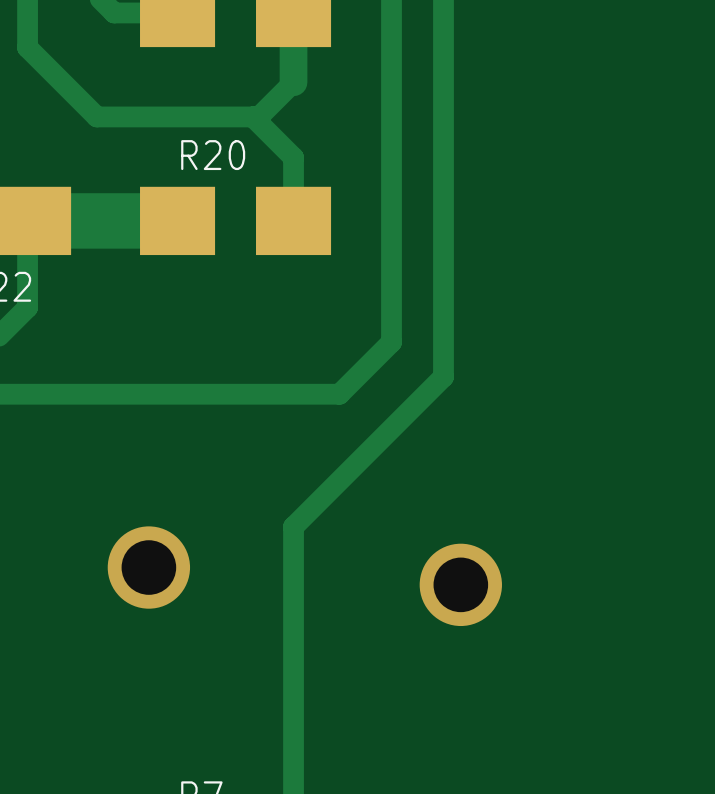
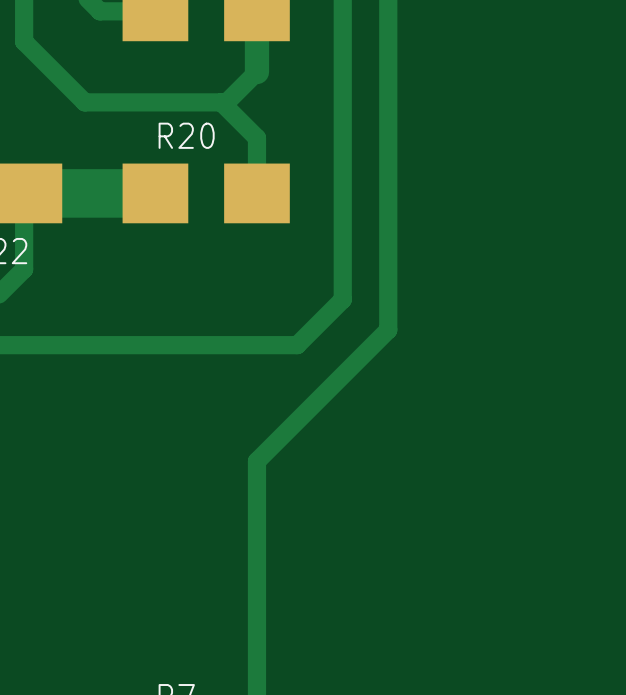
via: (148, 567) -> none
via: (460, 584) -> none

